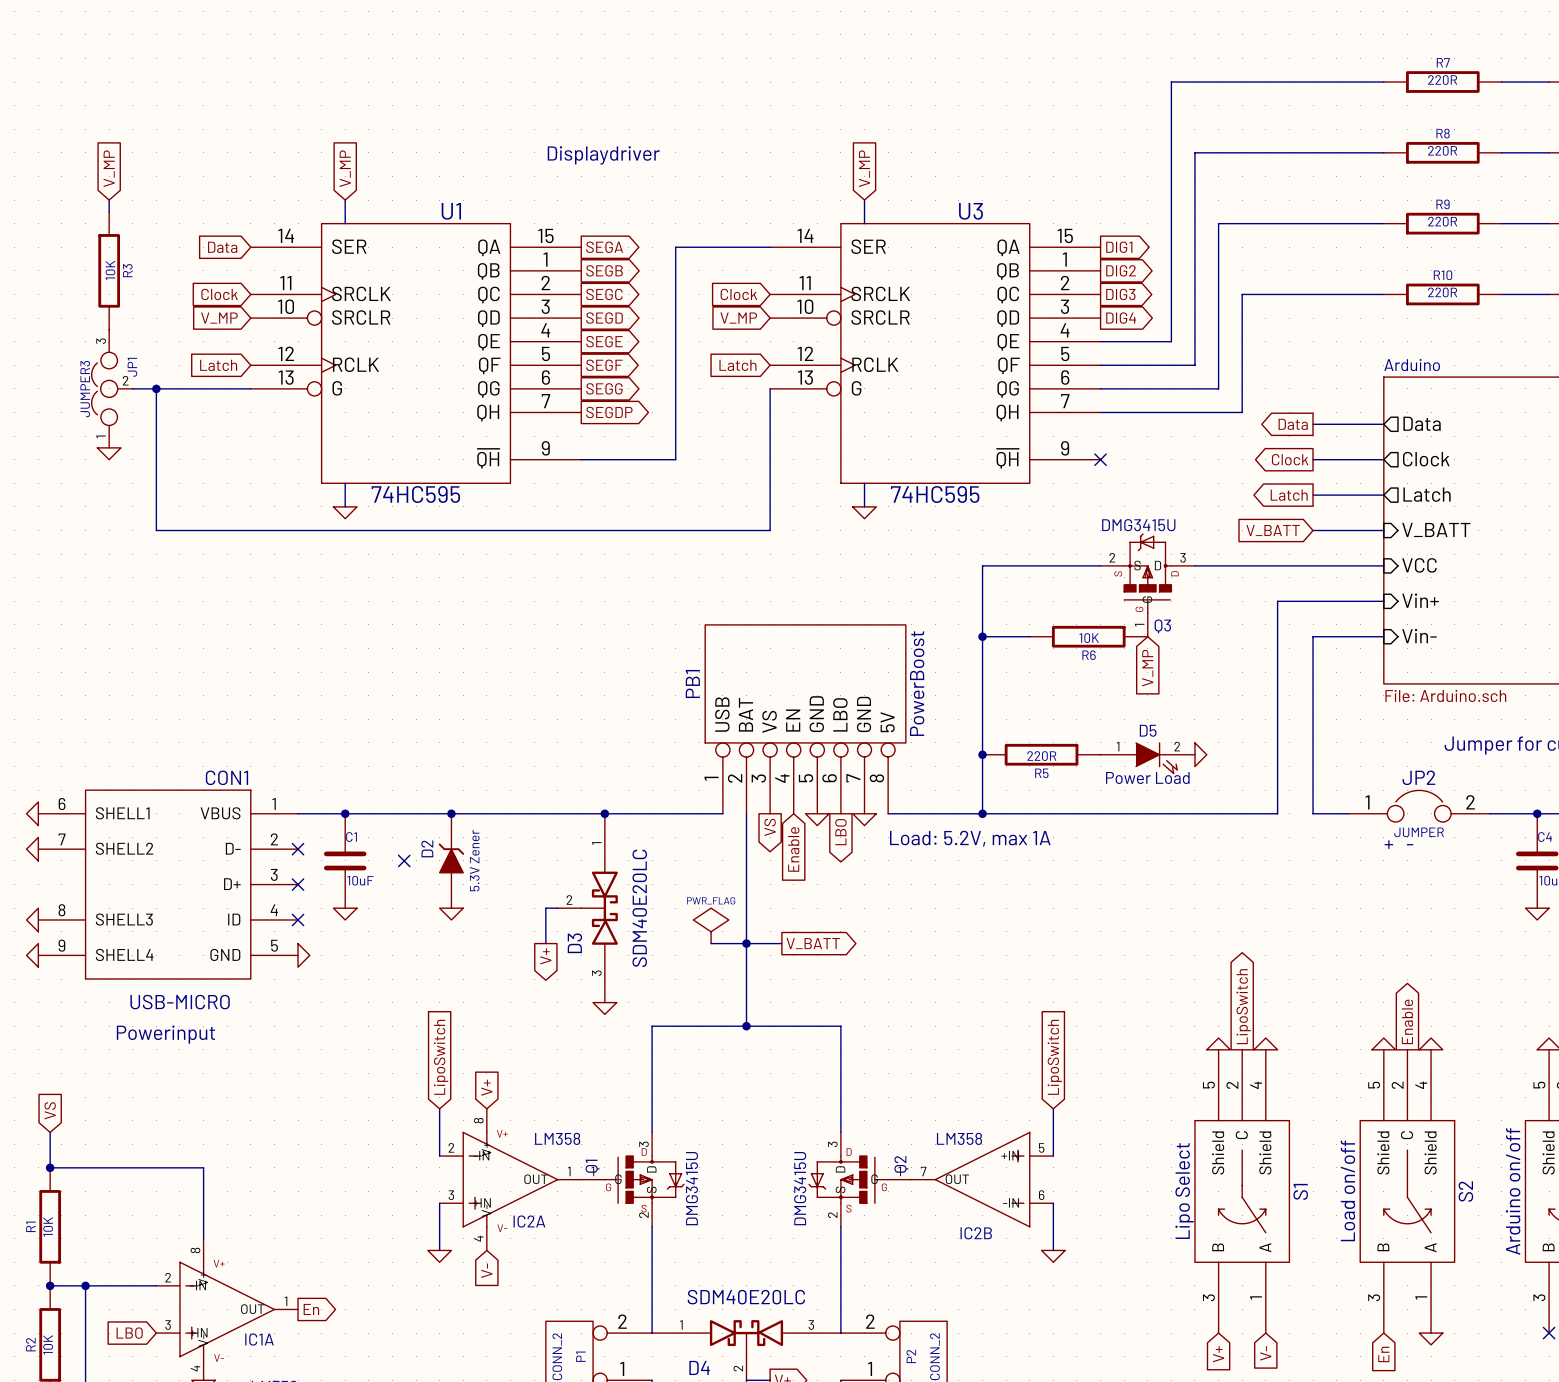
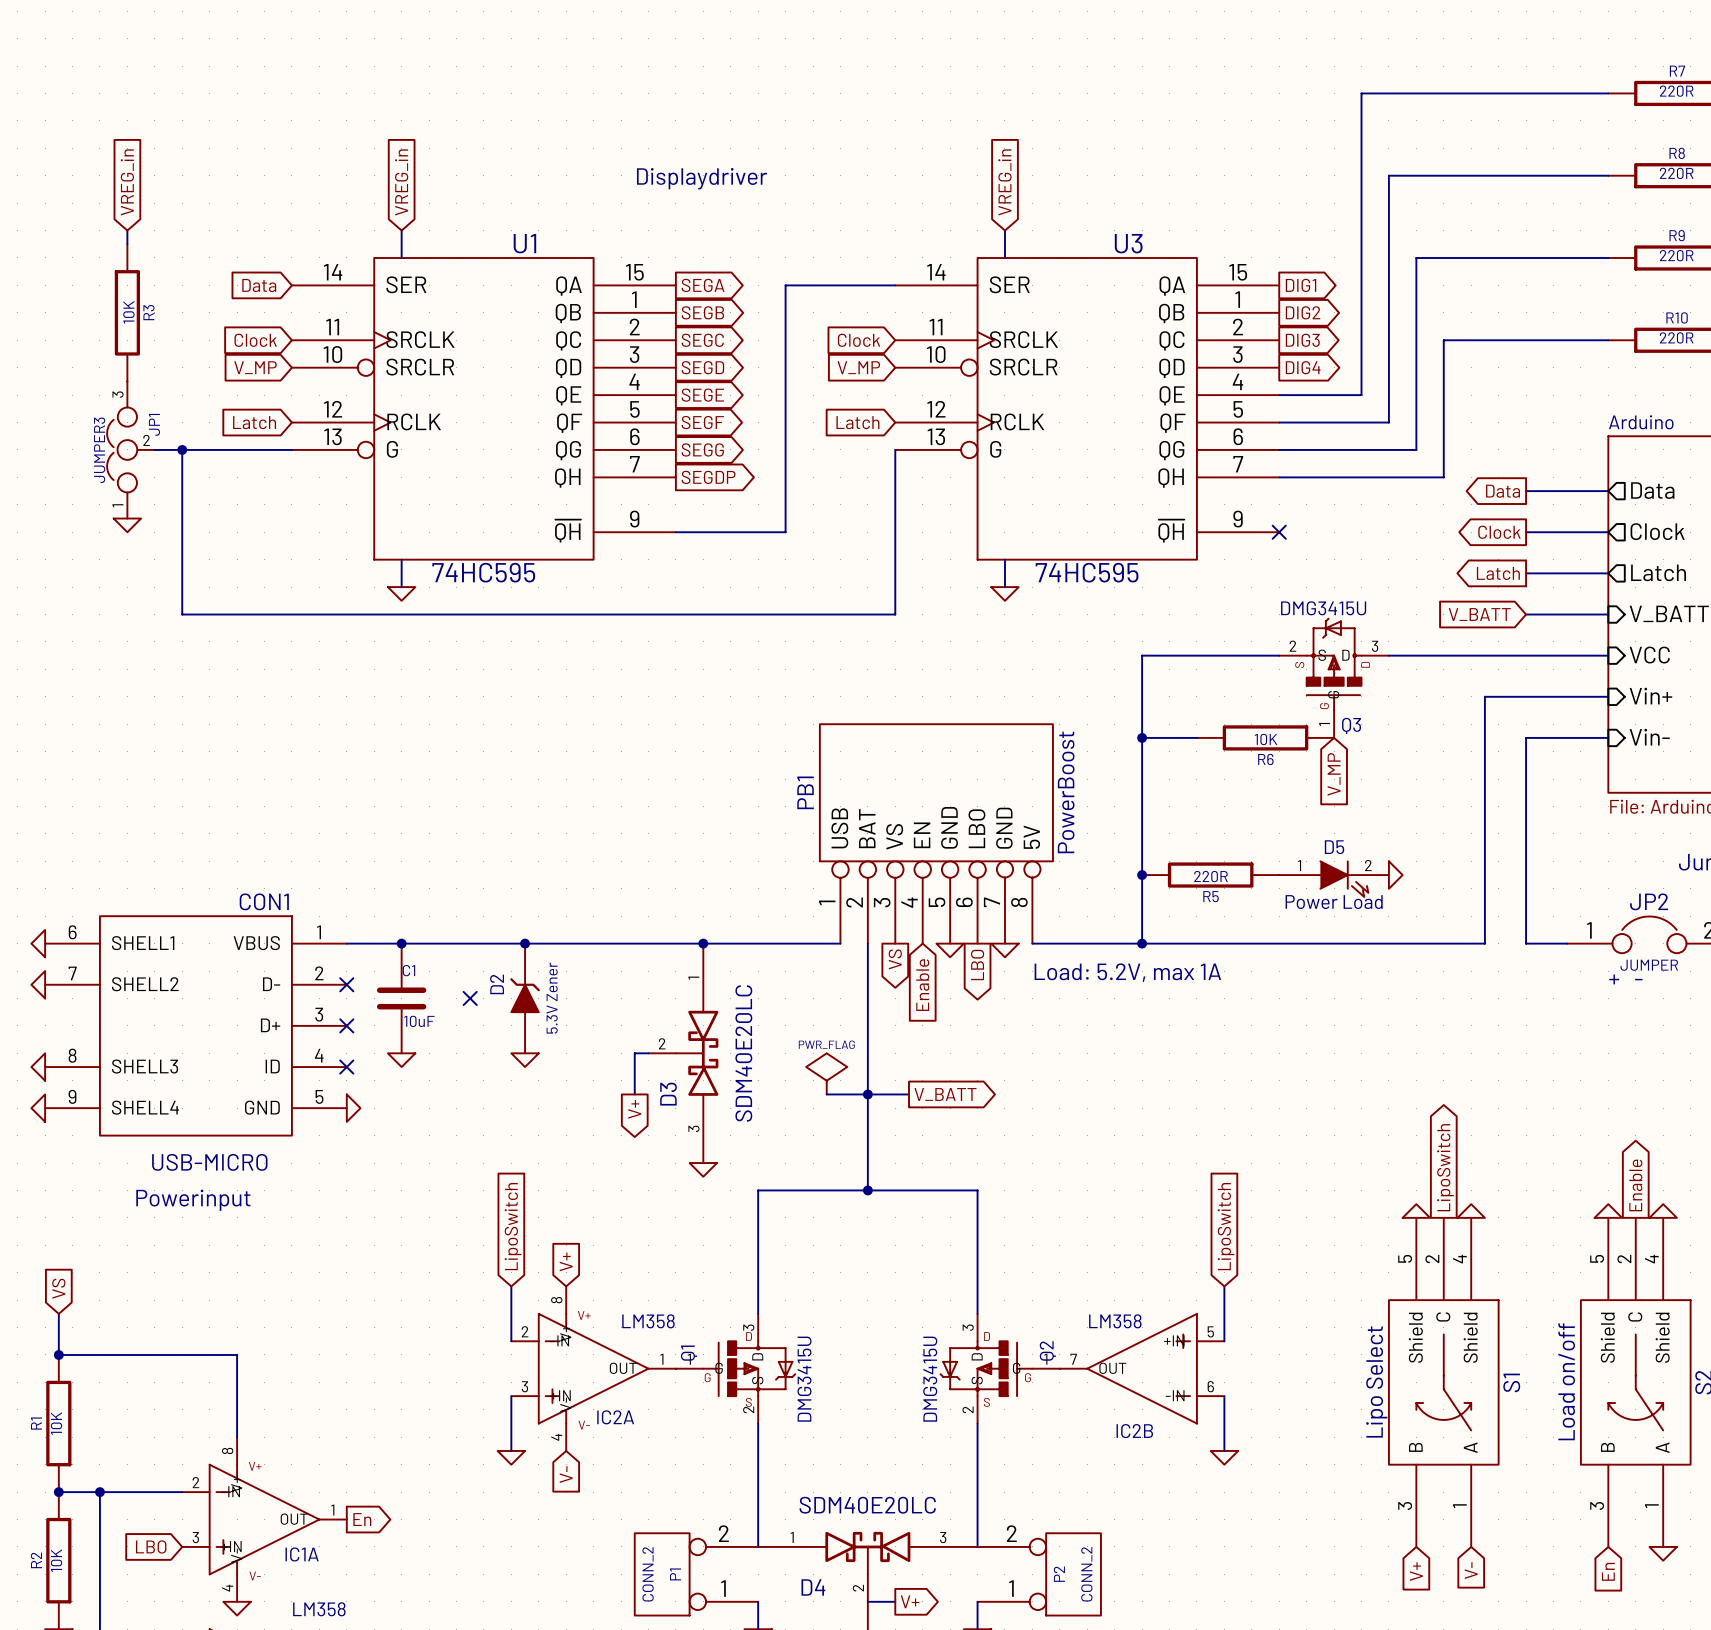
global label: V_MP (109, 168) -> VREG_in (127, 182)
global label: V_MP (345, 168) -> VREG_in (401, 182)
global label: V_MP (864, 168) -> VREG_in (1004, 182)

